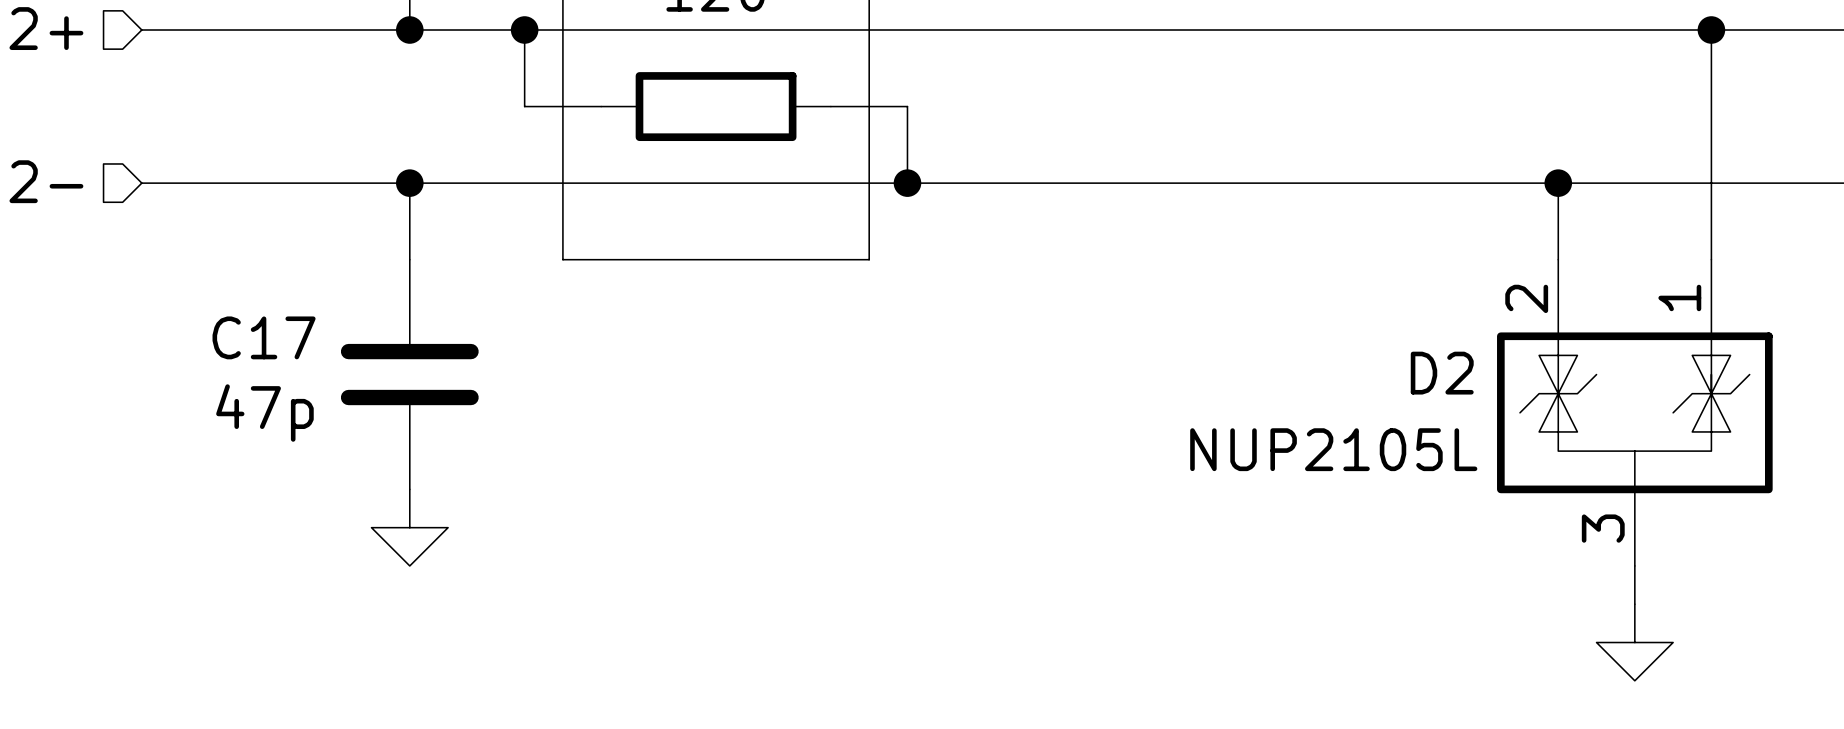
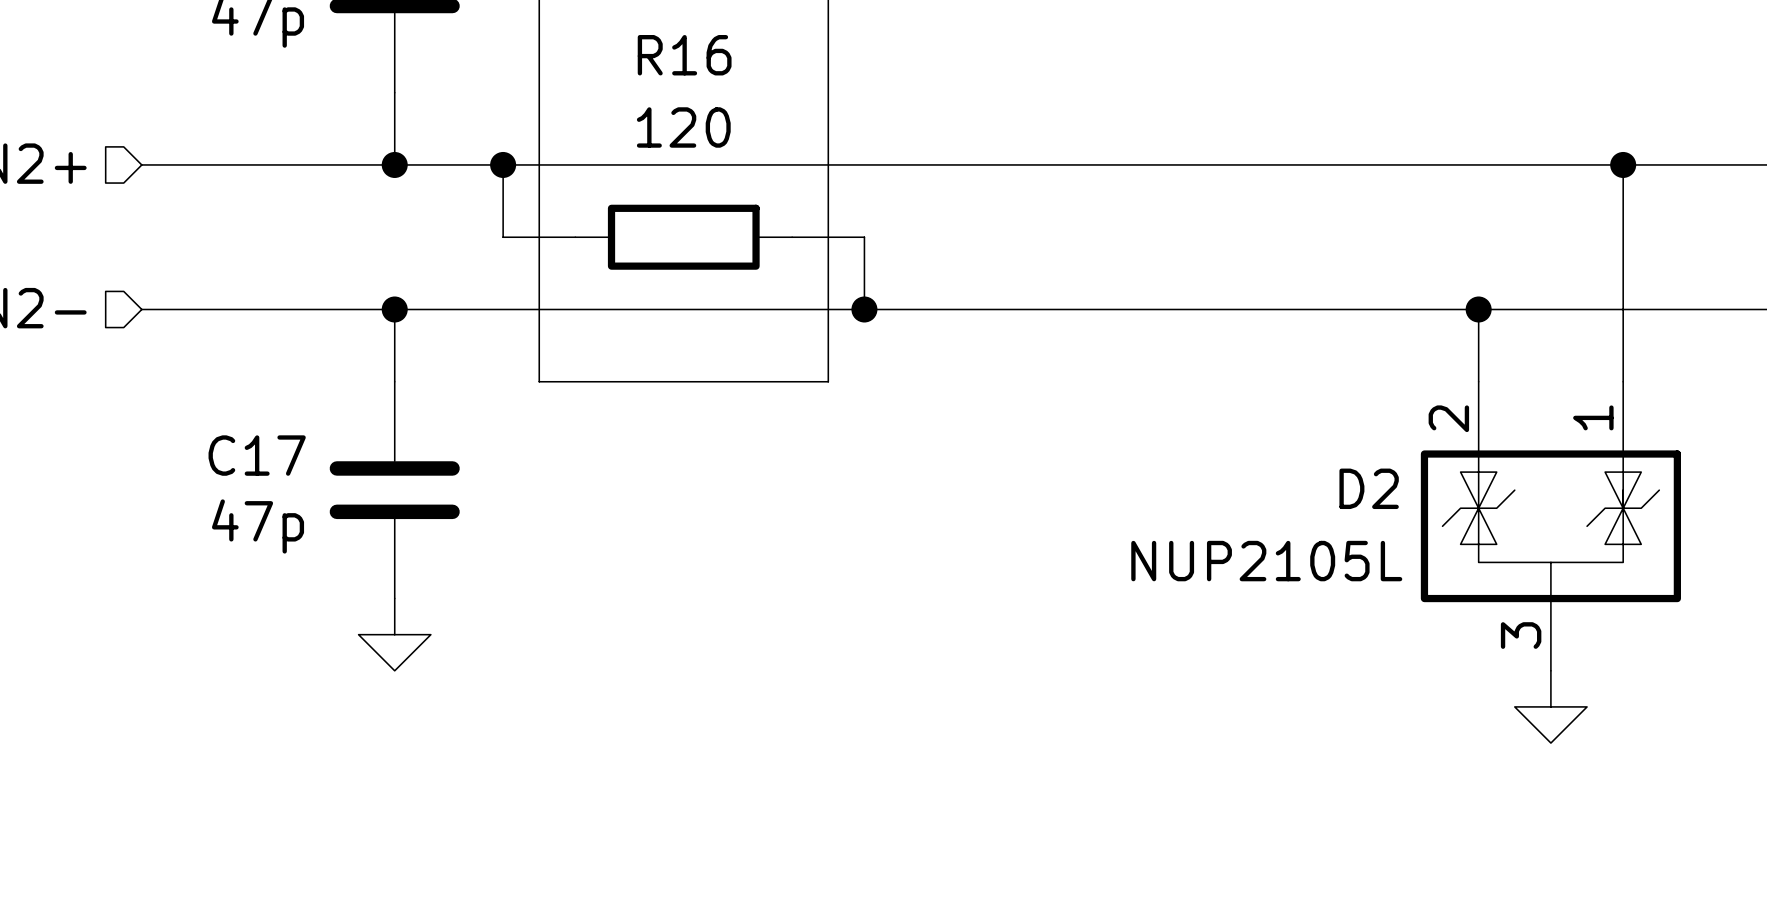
power symbol position: (1634, 642) -> (1550, 706)

